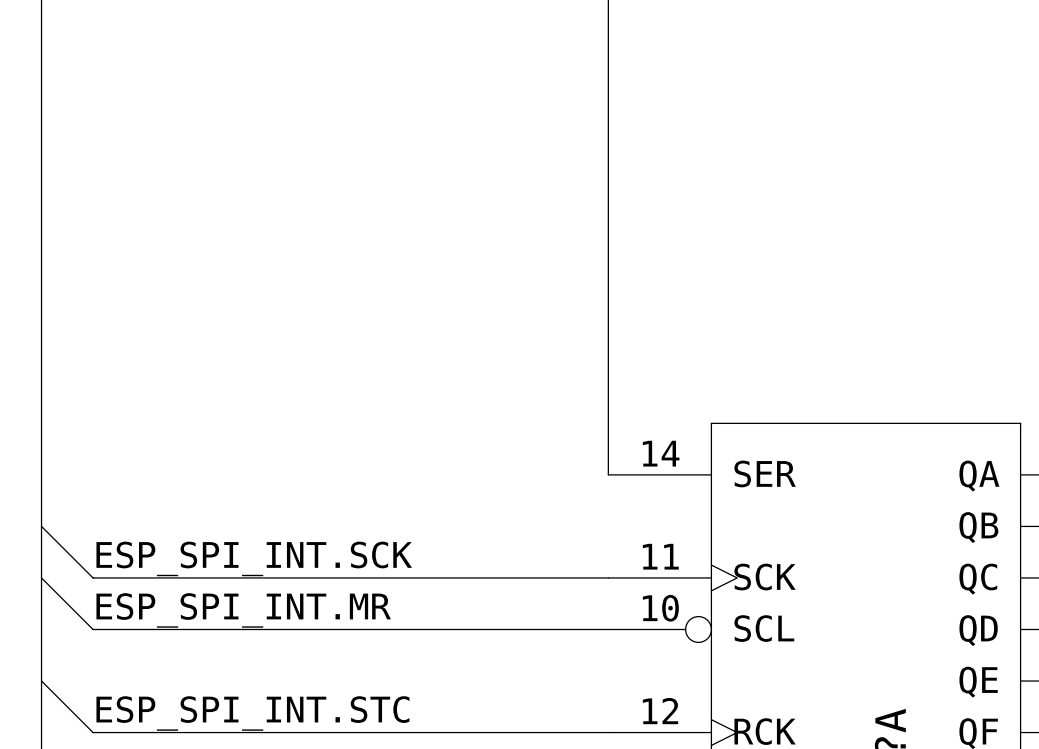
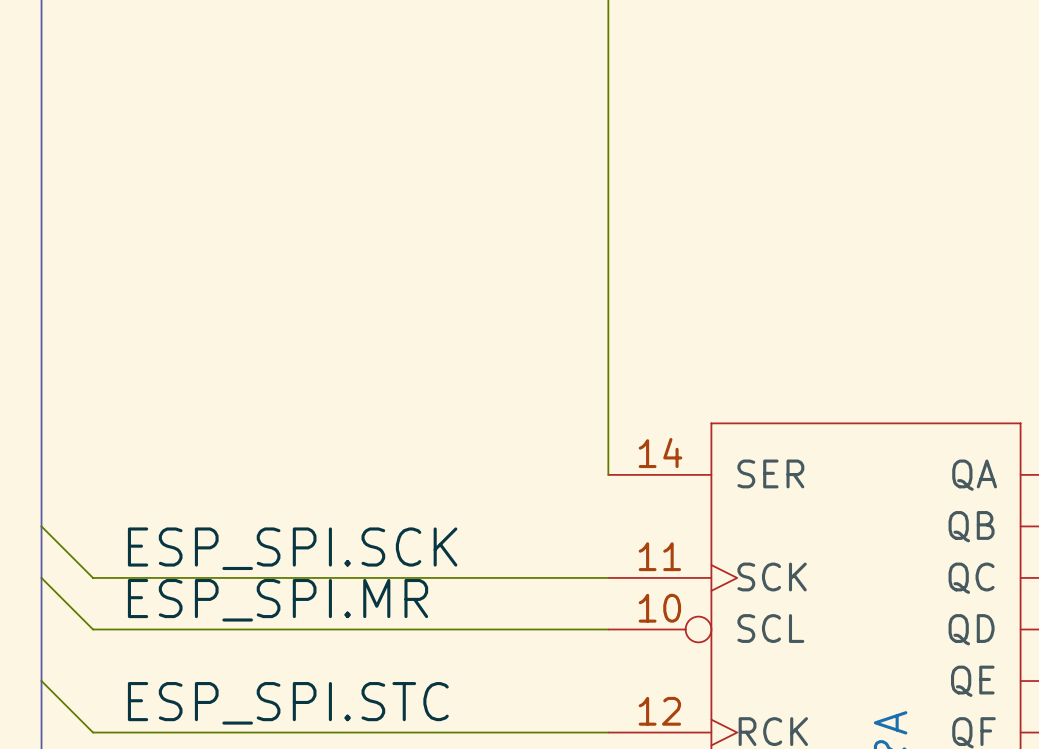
label: ESP_SPI_INT.SCK (254, 558) -> ESP_SPI.SCK (292, 548)
label: ESP_SPI_INT.MR (243, 610) -> ESP_SPI.MR (278, 600)
label: ESP_SPI_INT.STC (252, 713) -> ESP_SPI.STC (288, 703)

